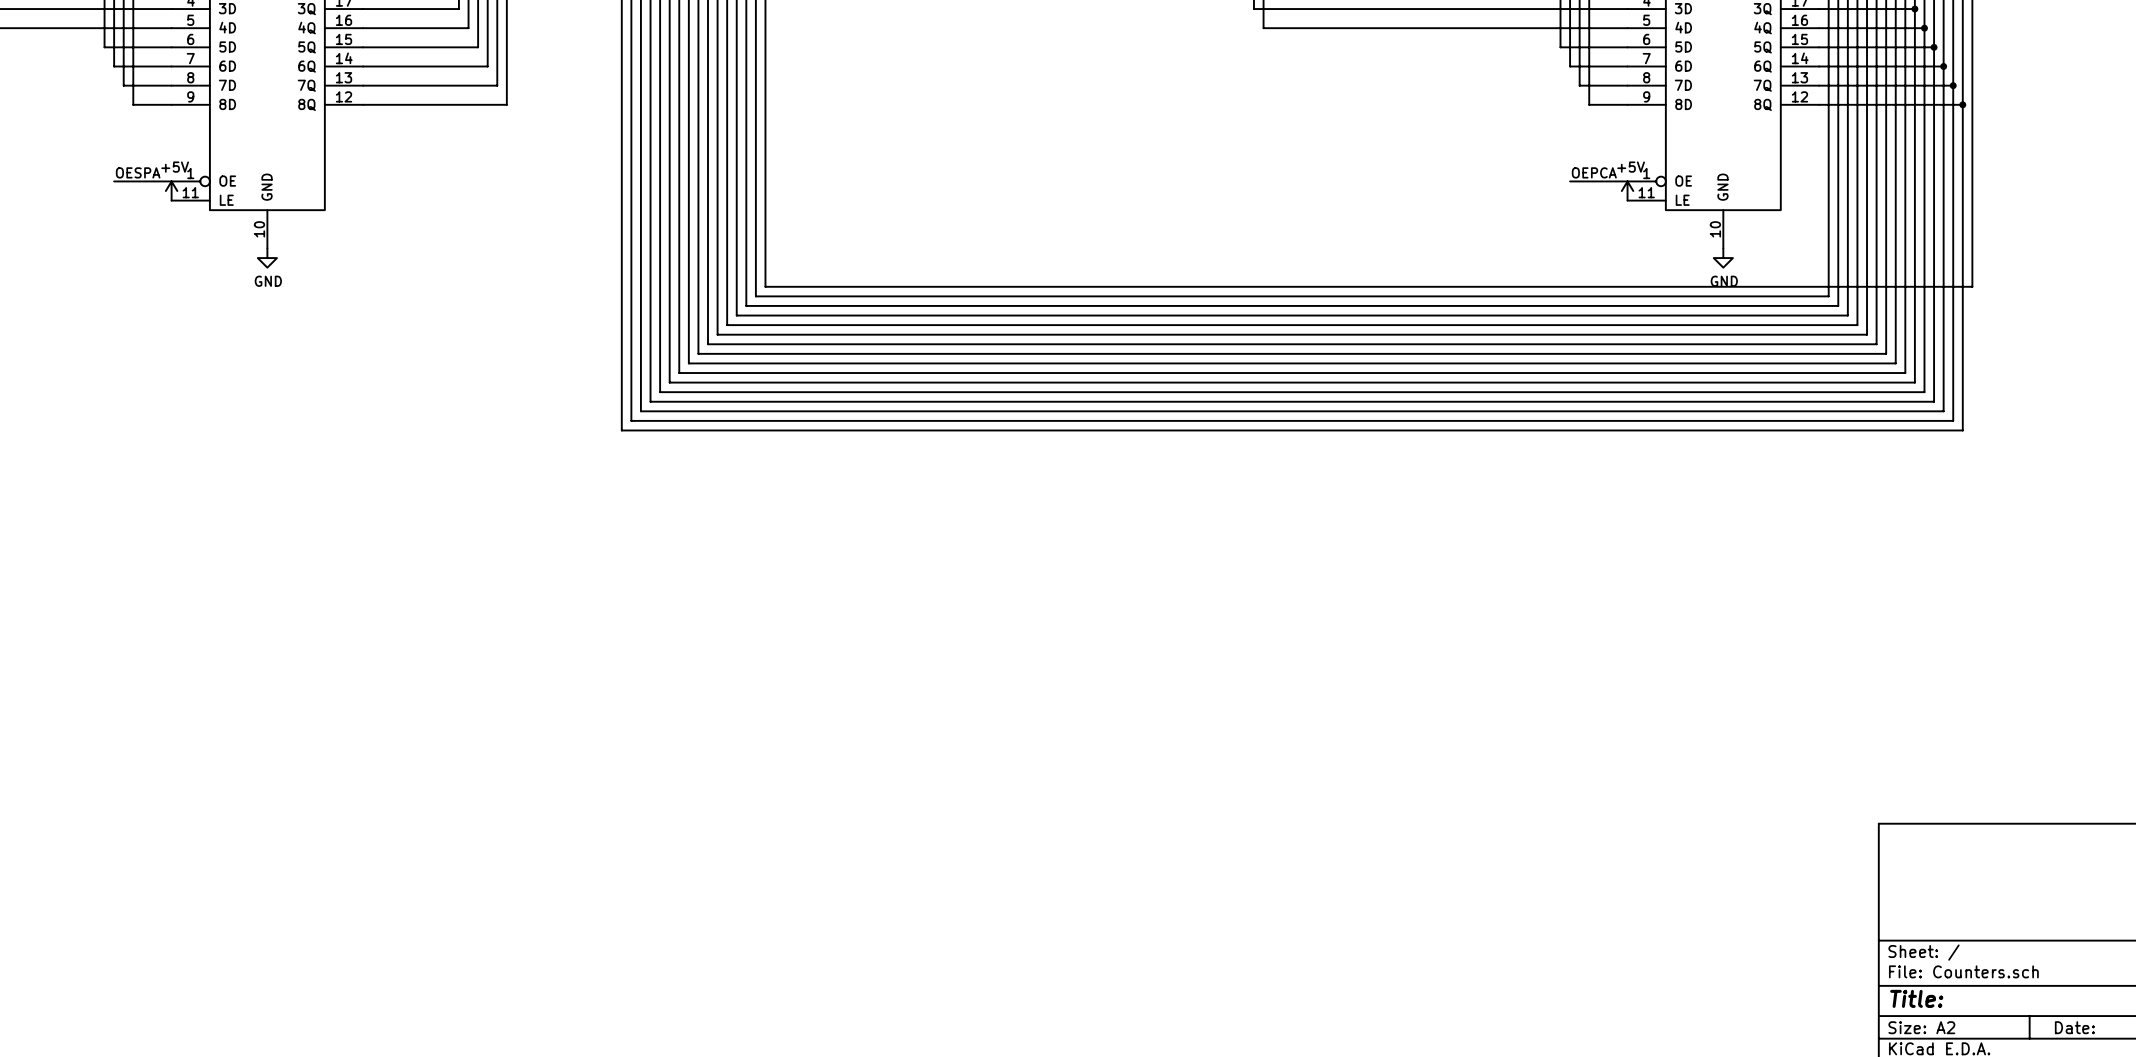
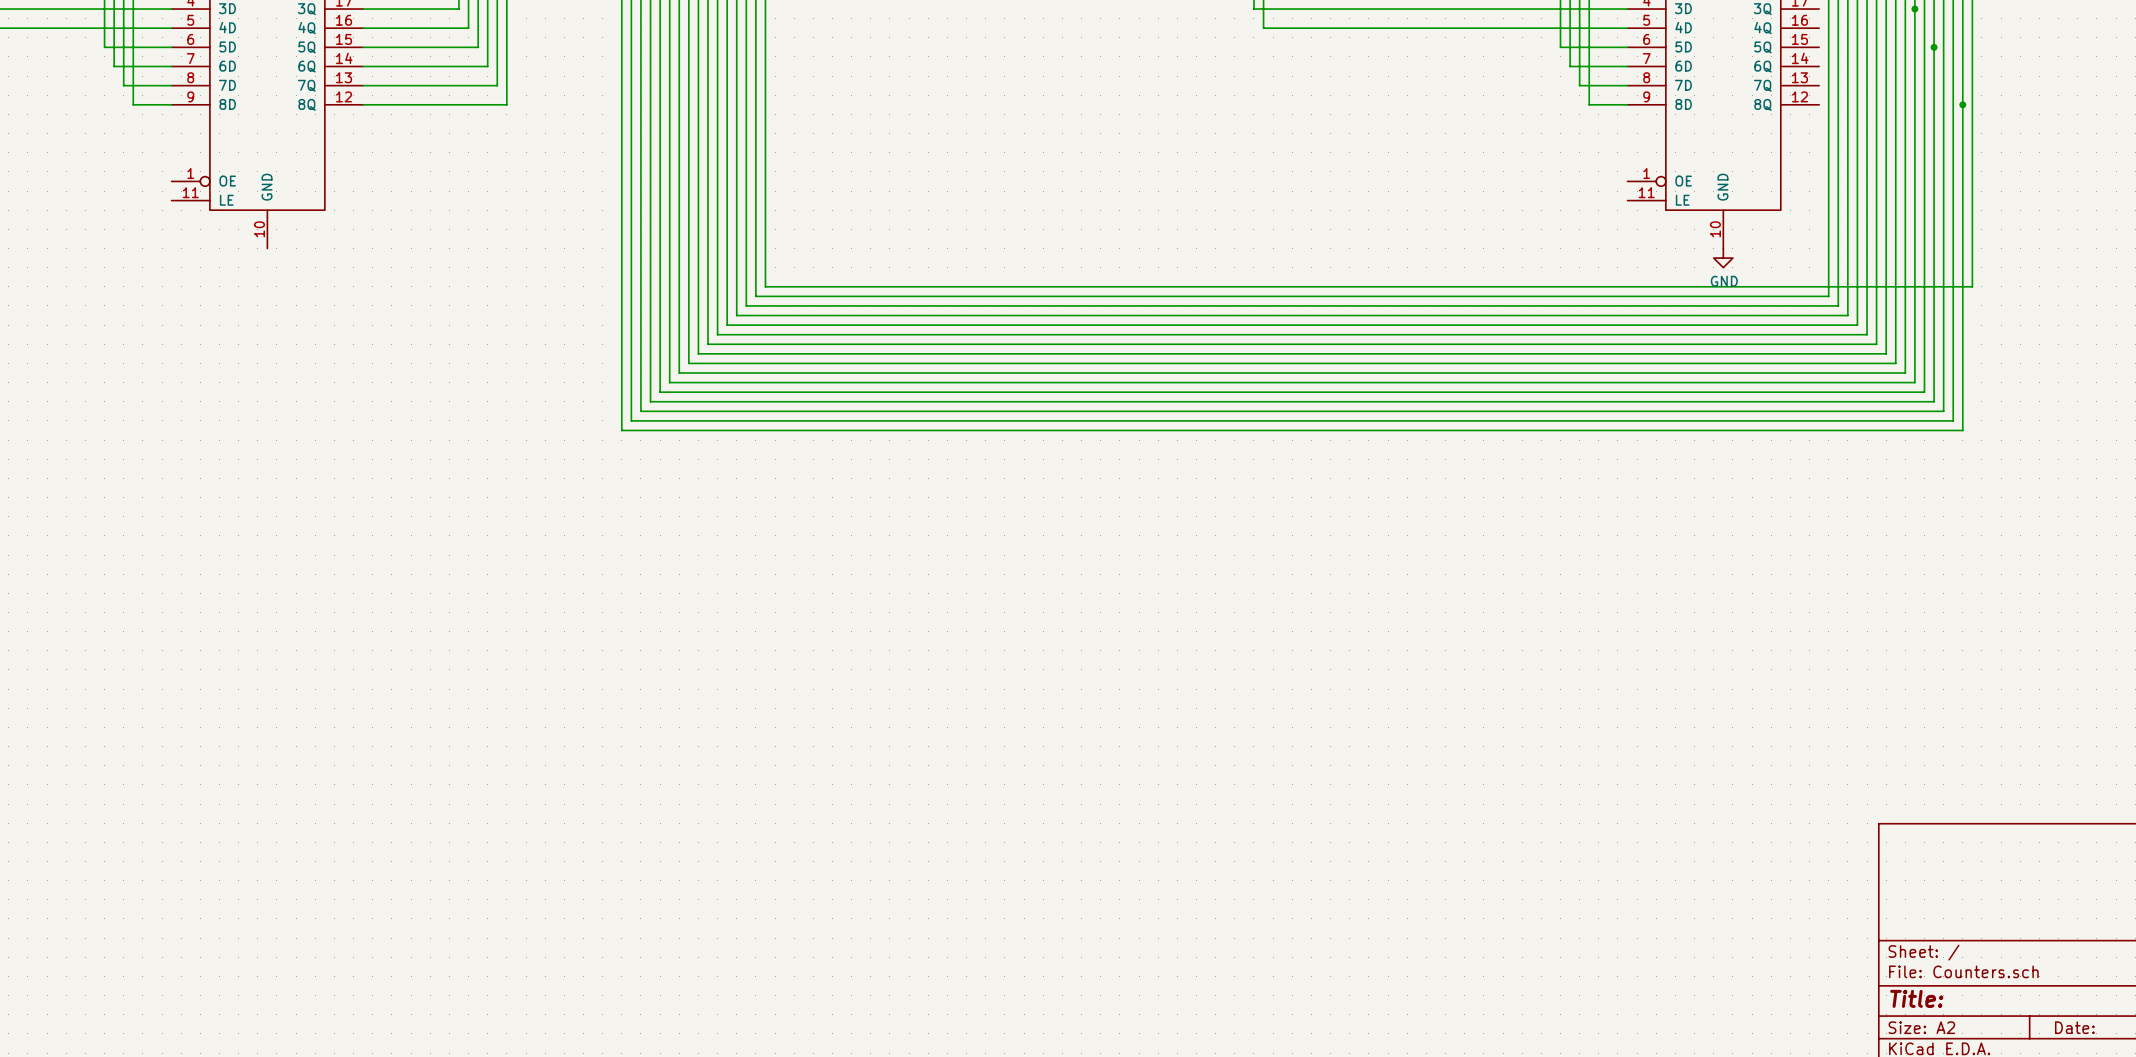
wire: (1819, 9) (1914, 9) -> none
wire: (1819, 28) (1924, 28) -> none
junction: (1924, 28) -> none
wire: (1819, 47) (1934, 47) -> none
wire: (1819, 66) (1943, 66) -> none
junction: (1943, 66) -> none
wire: (1819, 85) (1953, 85) -> none
junction: (1953, 85) -> none
wire: (1819, 104) (1962, 104) -> none
label: OESPA (138, 172) -> none
label: OEPCA (1594, 172) -> none
wire: (114, 181) (171, 181) -> none
wire: (1570, 181) (1627, 181) -> none
power symbol: +5V (171, 191) -> none
power symbol: +5V (1627, 191) -> none
power symbol: GND (267, 258) -> none

